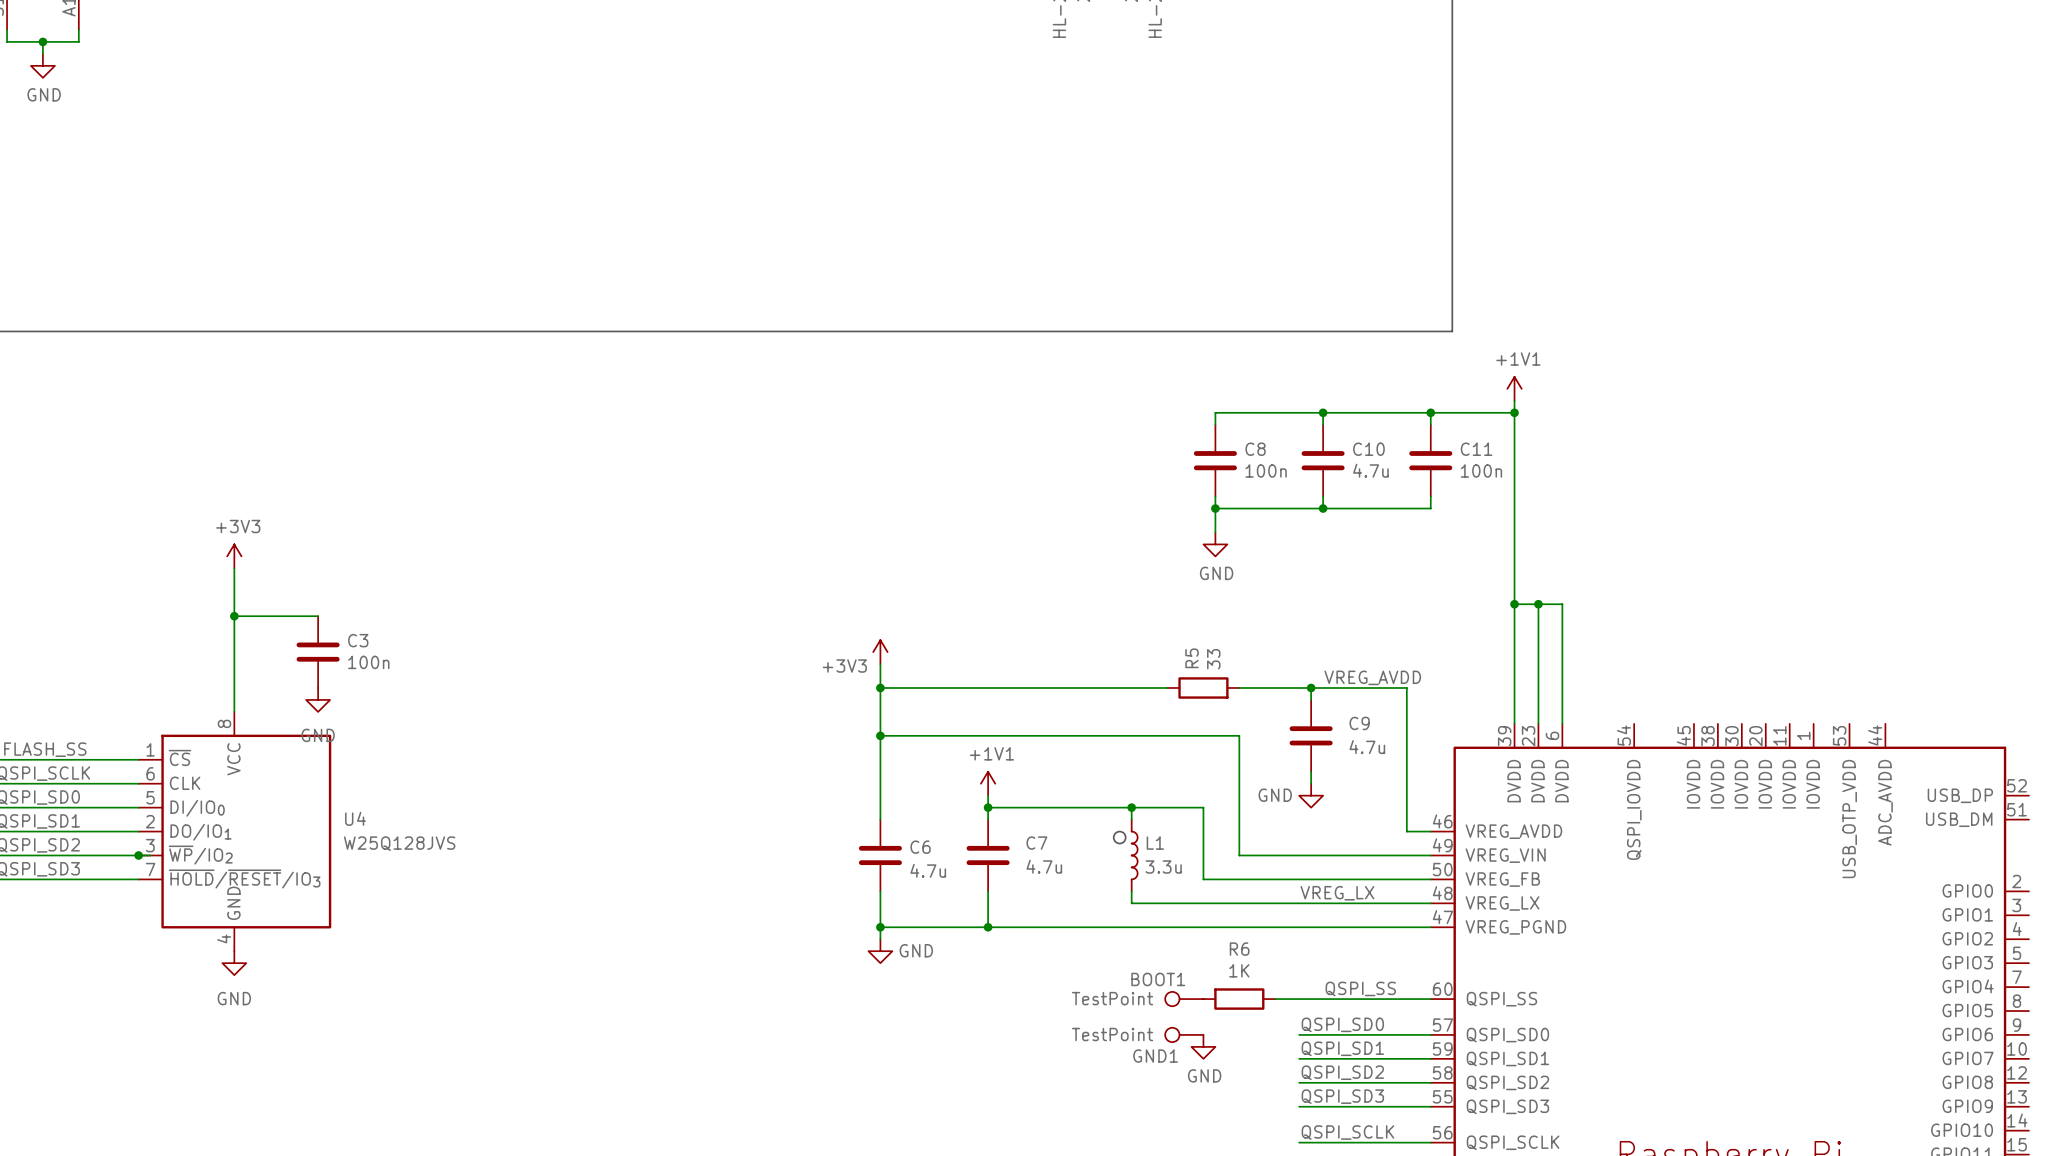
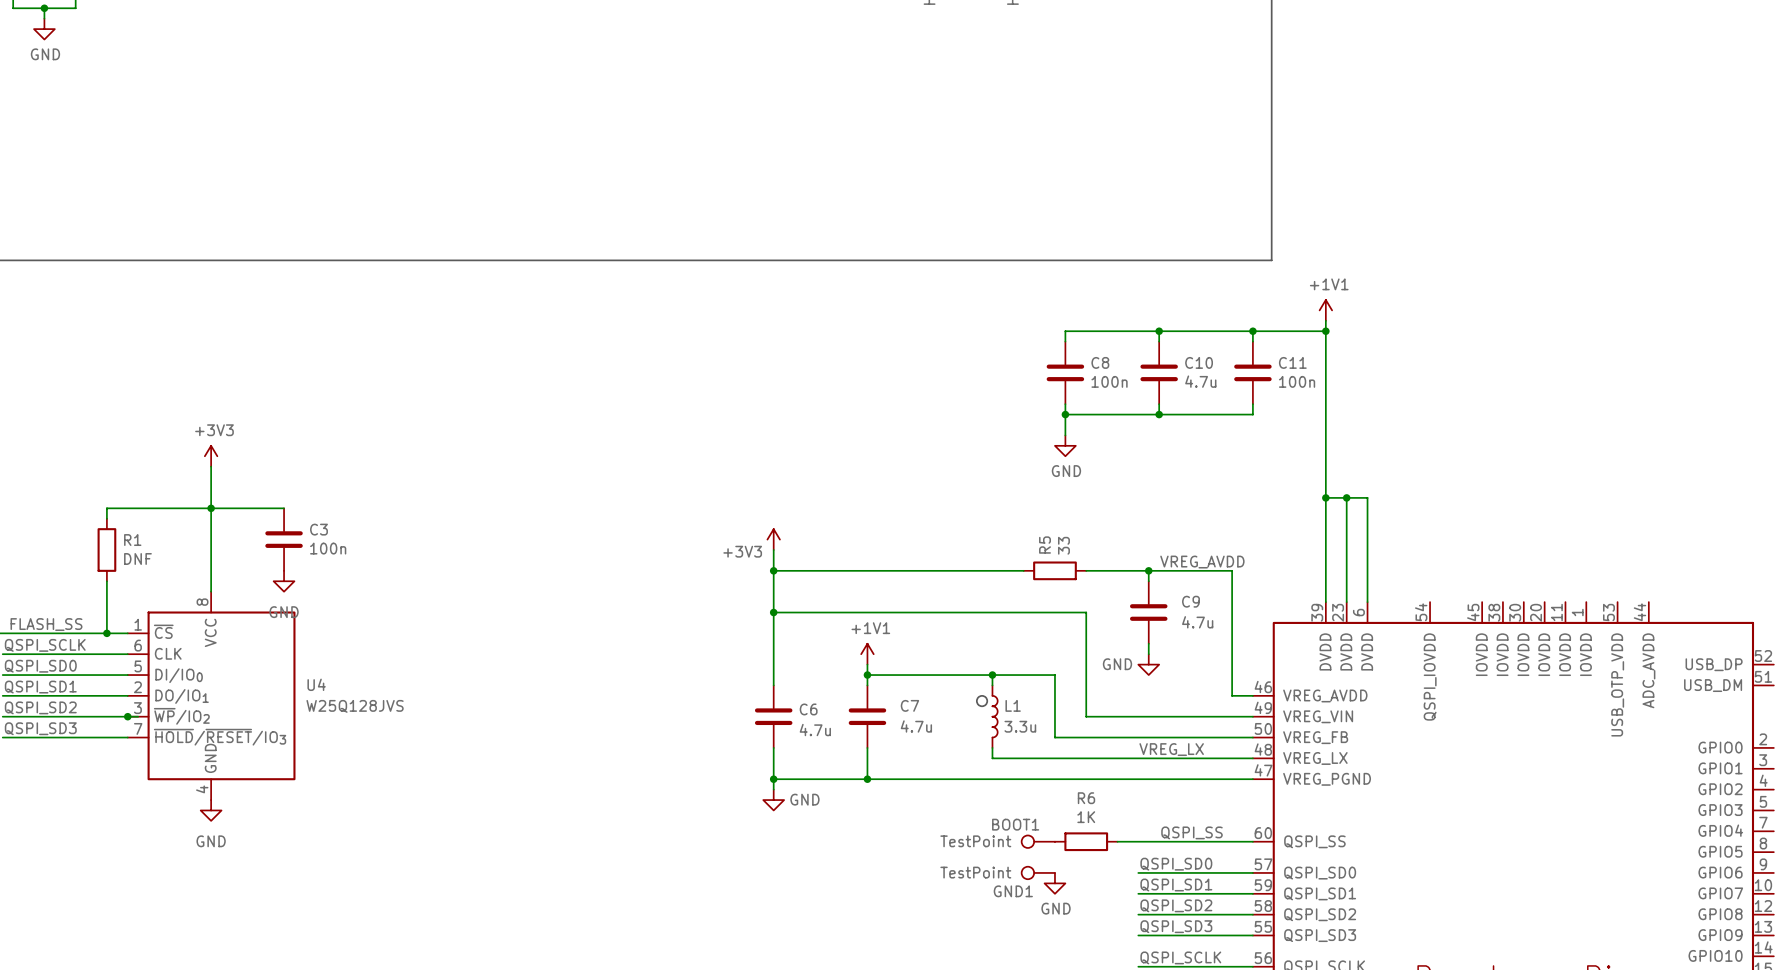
wire: none -> (211, 508) (106, 508) (106, 518)
R1: none -> DNF (106, 550)
wire: none -> (106, 581) (106, 633)
junction: none -> (106, 633)

